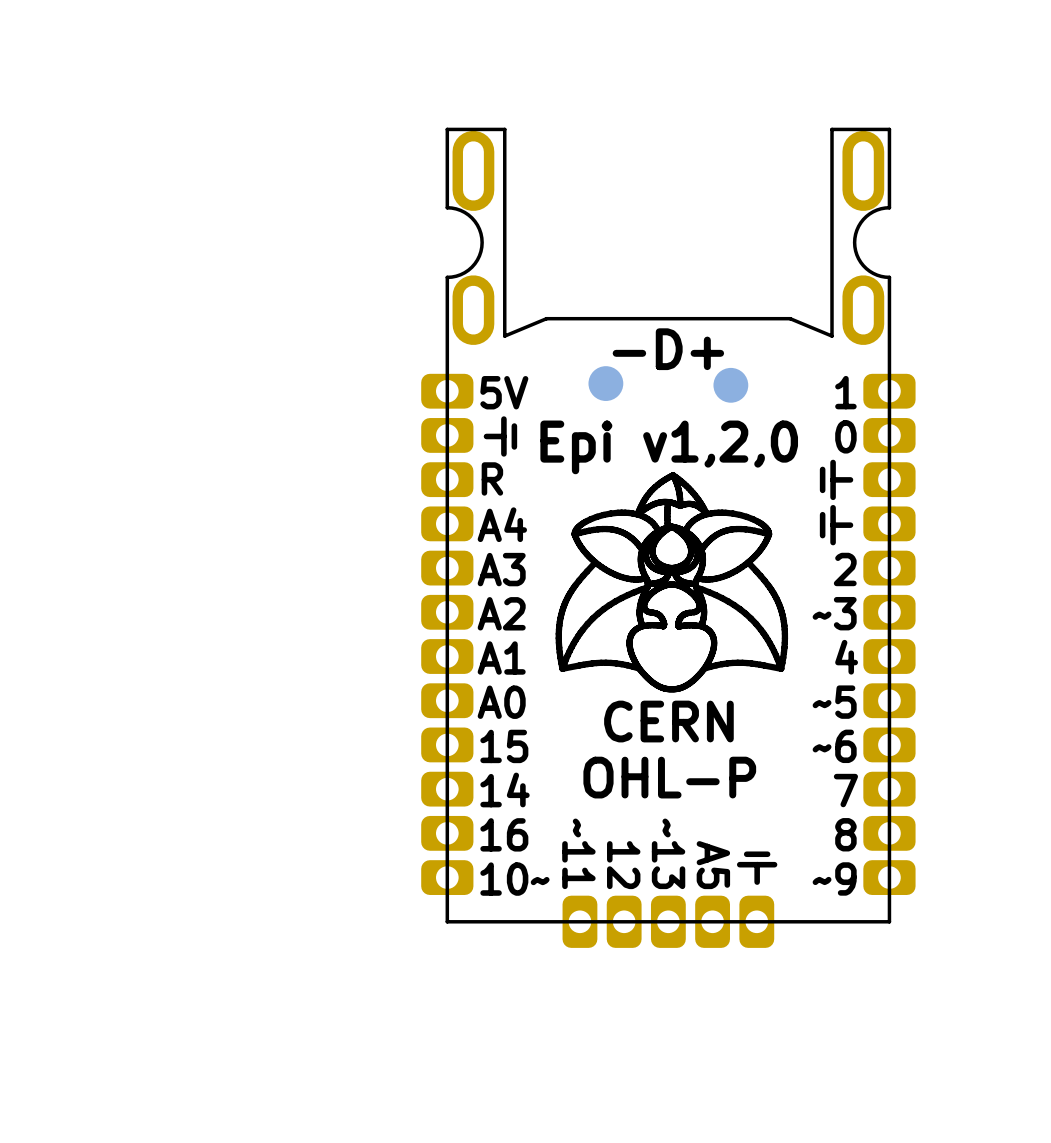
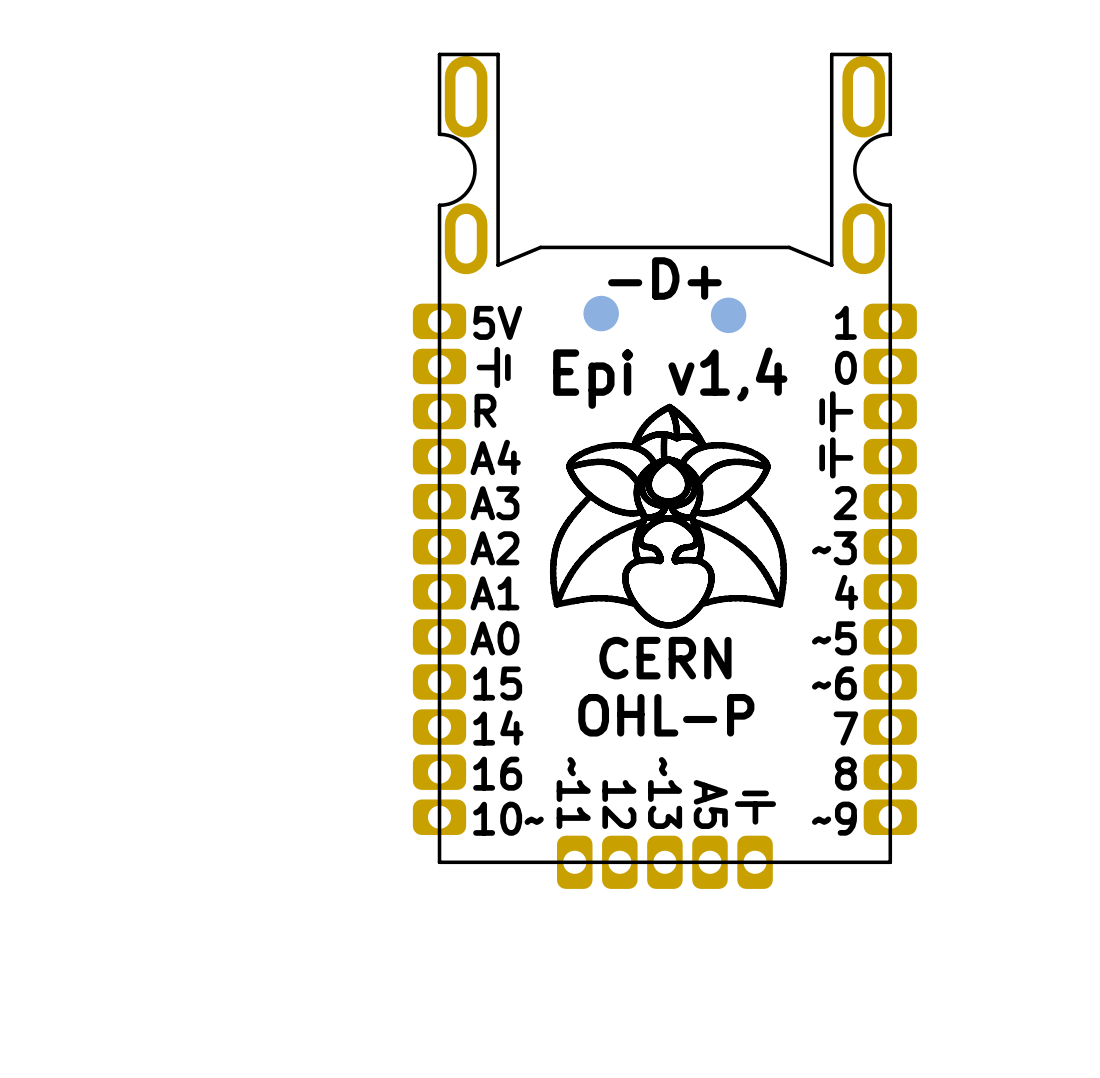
text: Epi v1,2,0 (669, 447) -> Epi v1,4 (670, 378)

